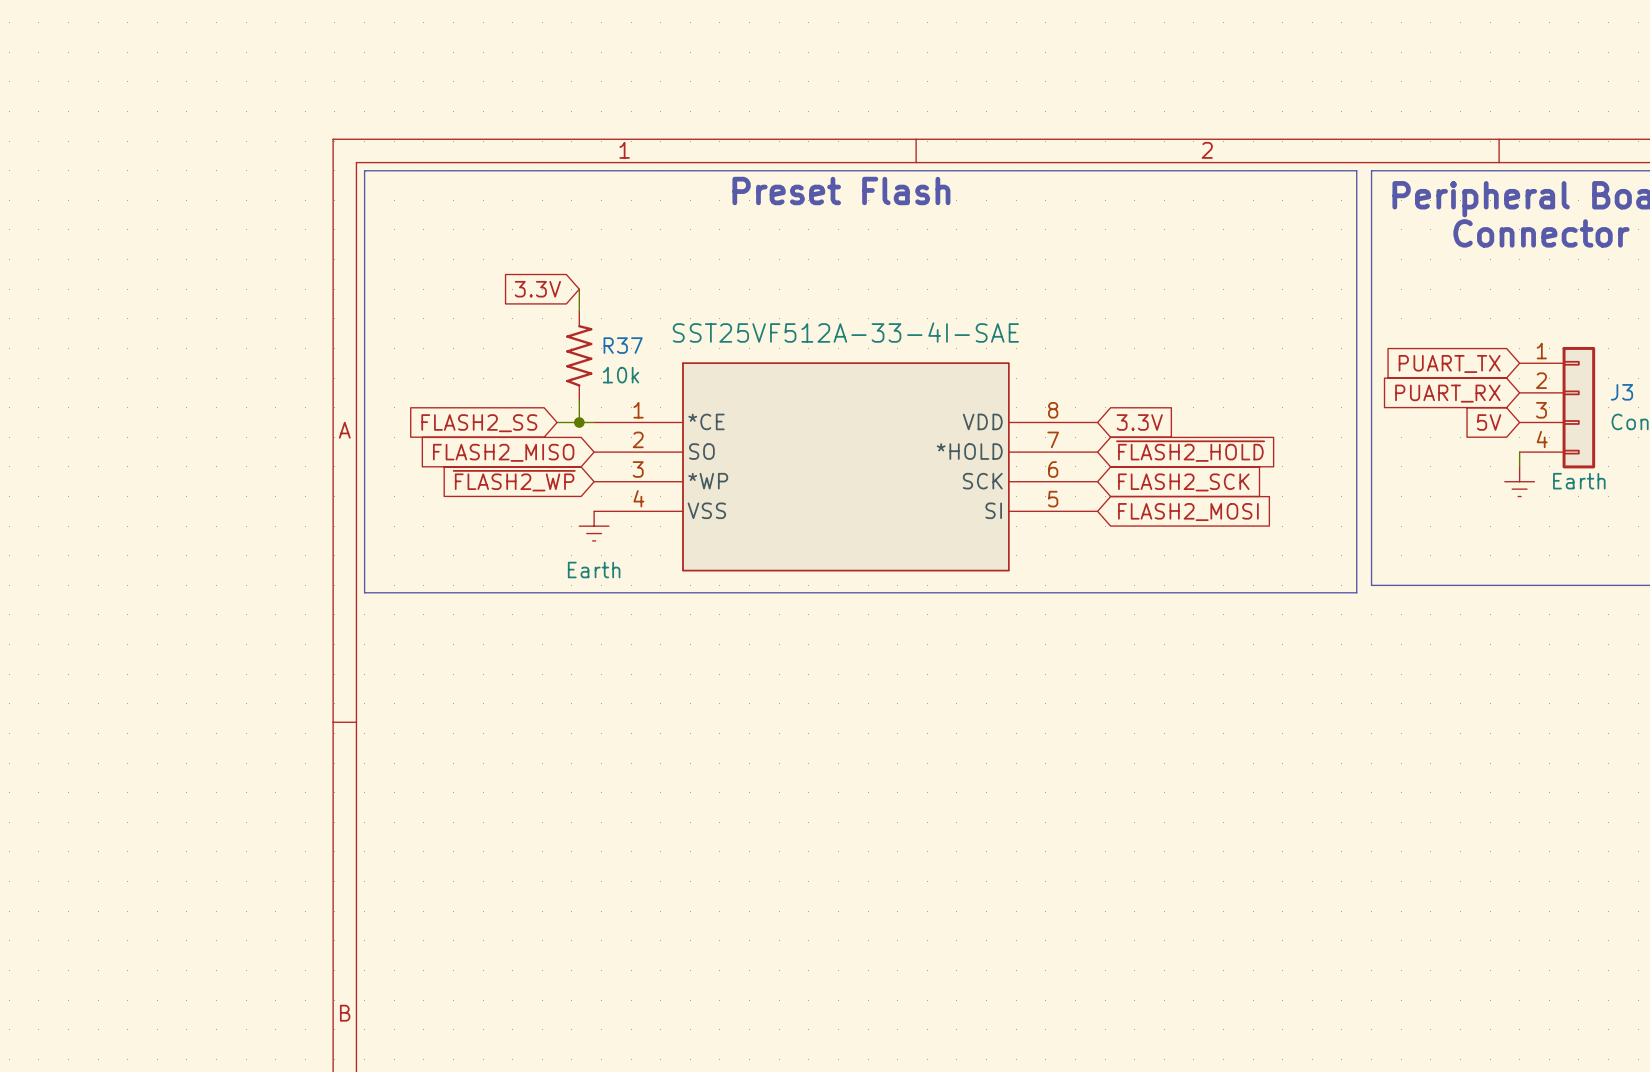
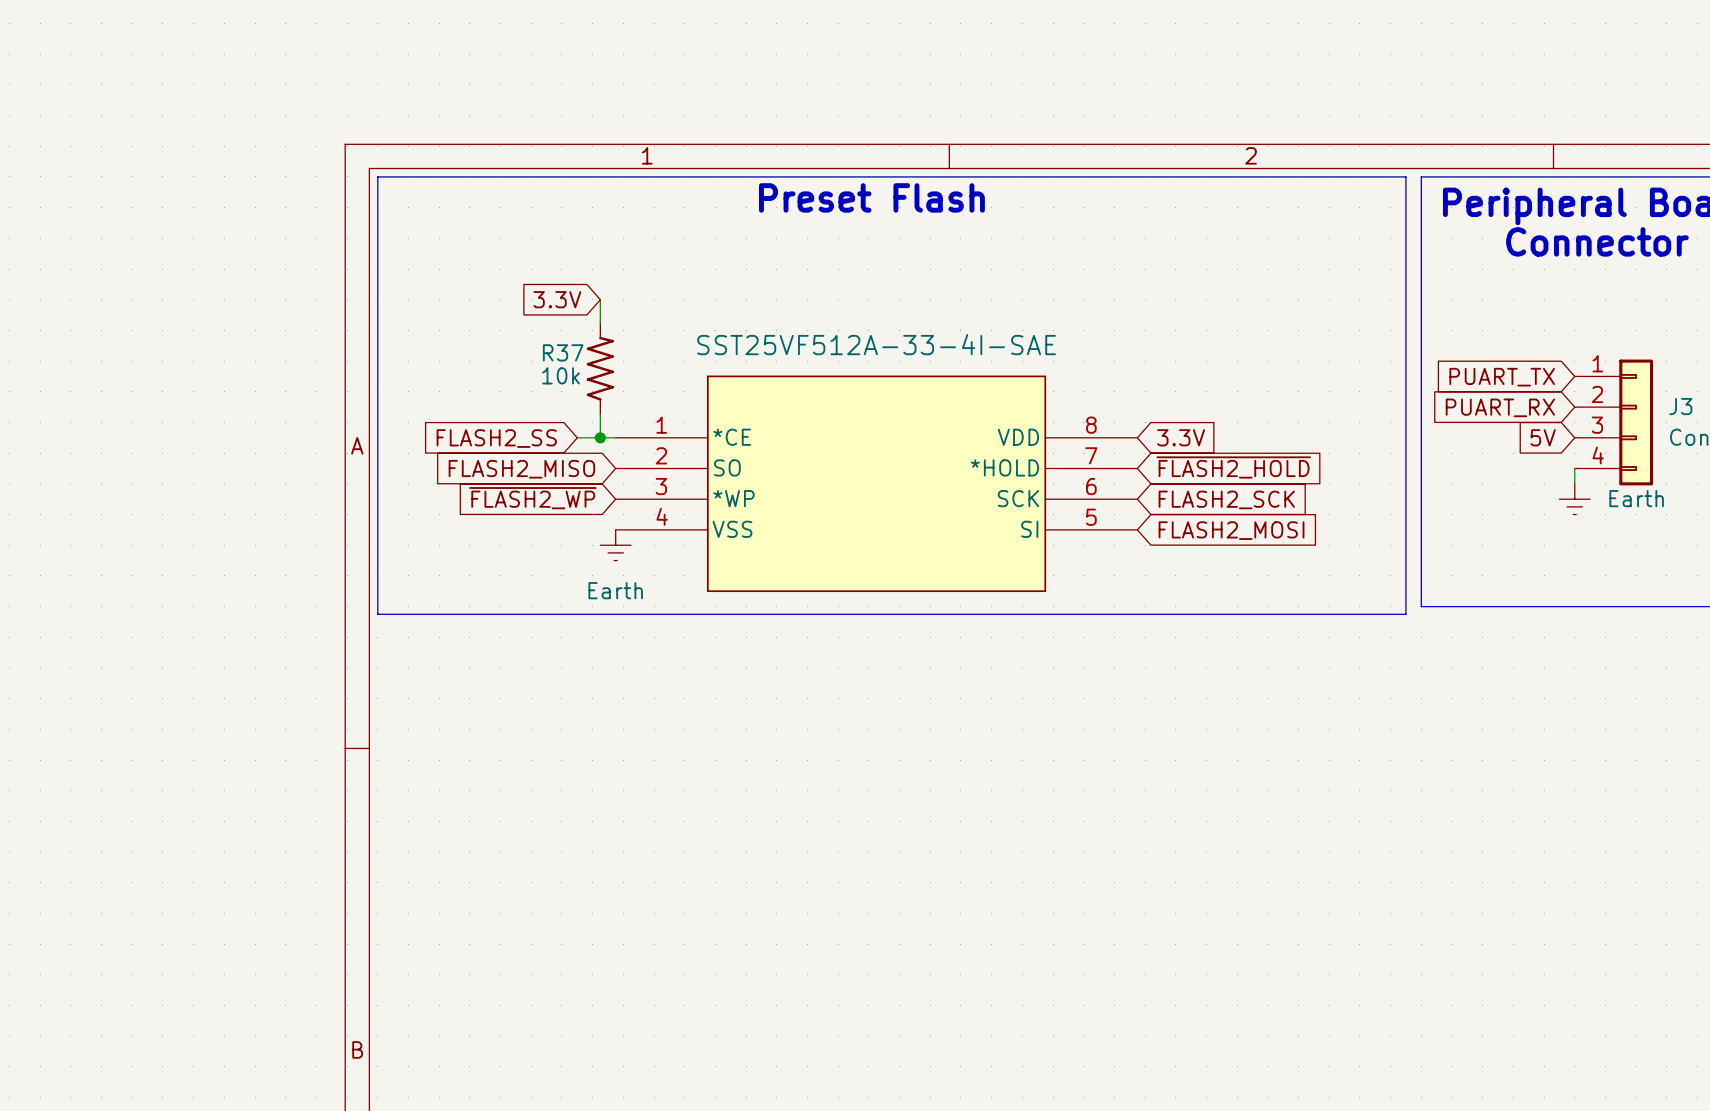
R37 name position: R37 (623, 345) -> R37 (563, 352)
R37 value position: 10k (621, 375) -> 10k (560, 375)

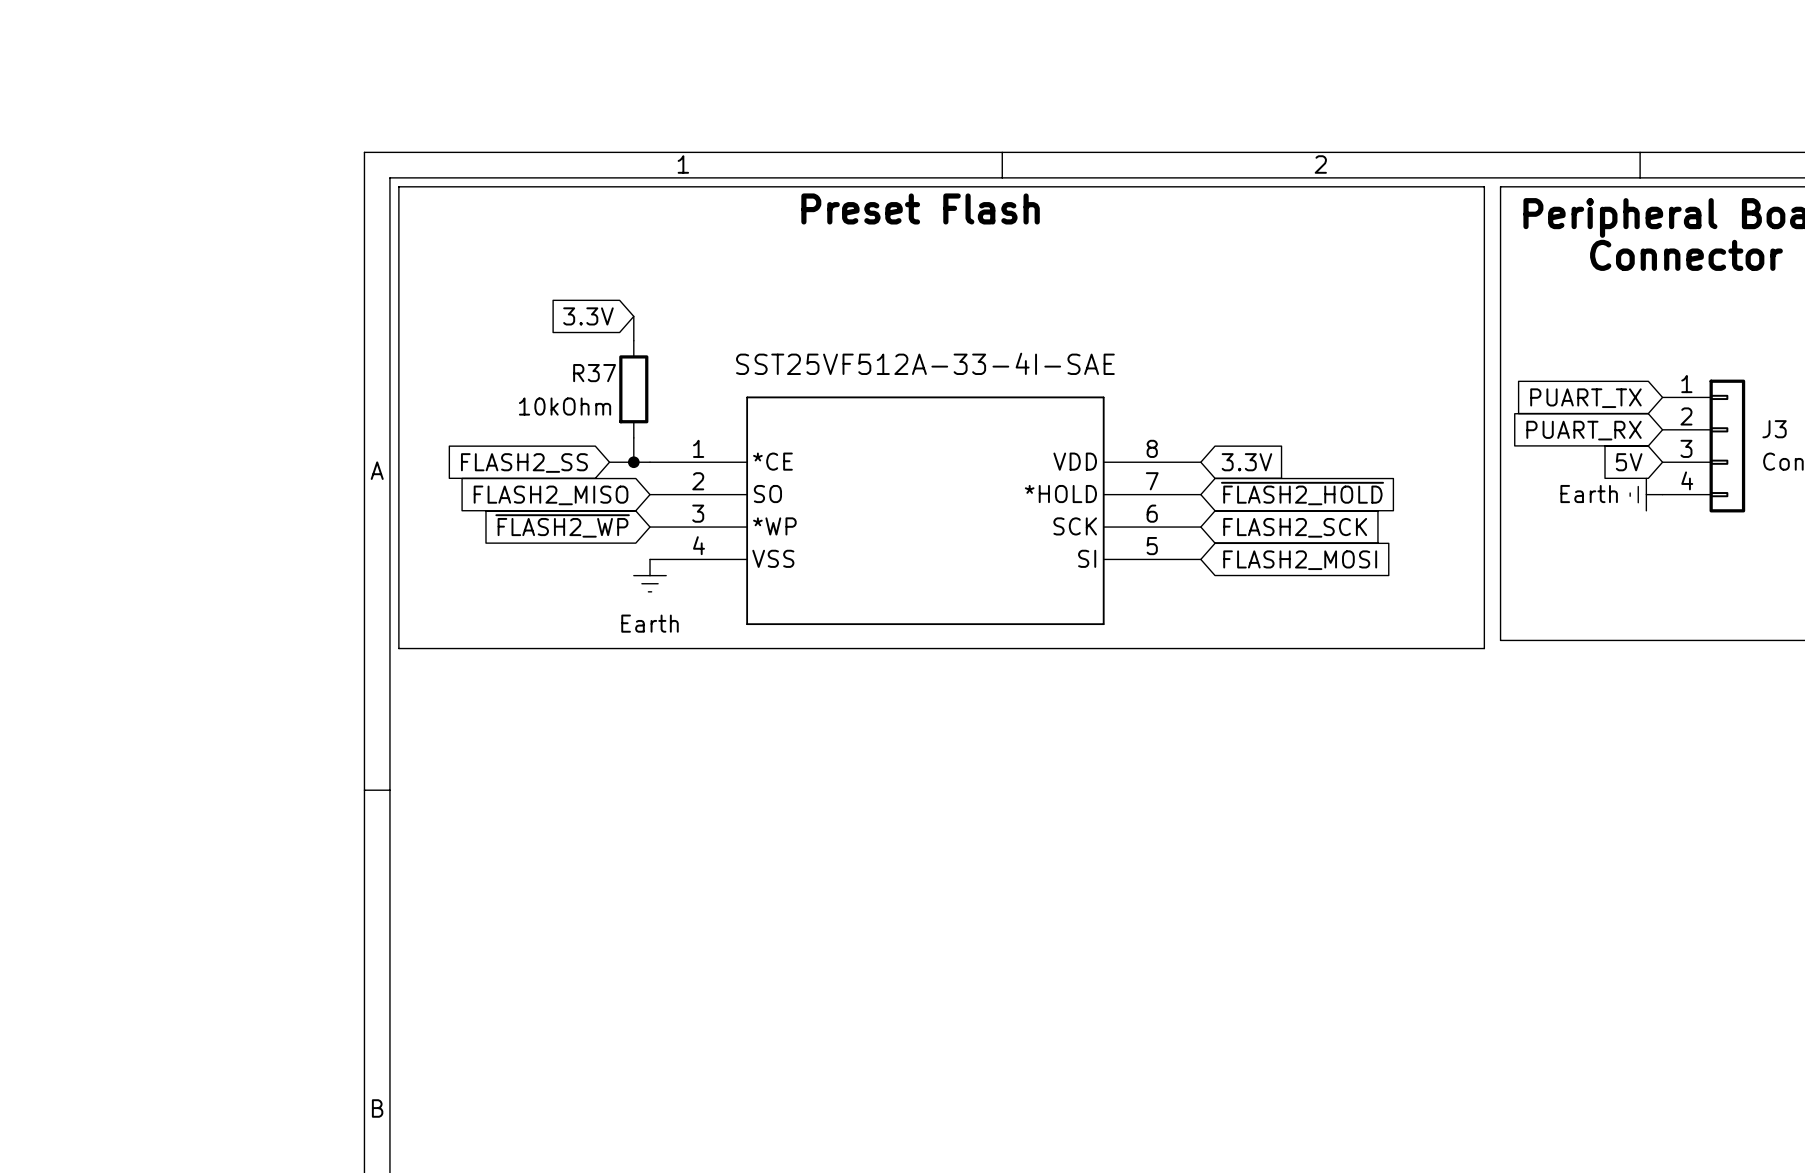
R37 symbol: [586, 322, 614, 415] -> [619, 340, 649, 438]
R37 value: 10k (560, 375) -> 10kOhm (565, 406)
wire: (1574, 468) (1574, 483) -> none
power symbol text position: Earth (1636, 498) -> Earth (1589, 494)
power symbol rotation: 0° (1574, 499) -> 90° clockwise (1646, 494)
power symbol position: Earth (1574, 499) -> Earth (1646, 494)

